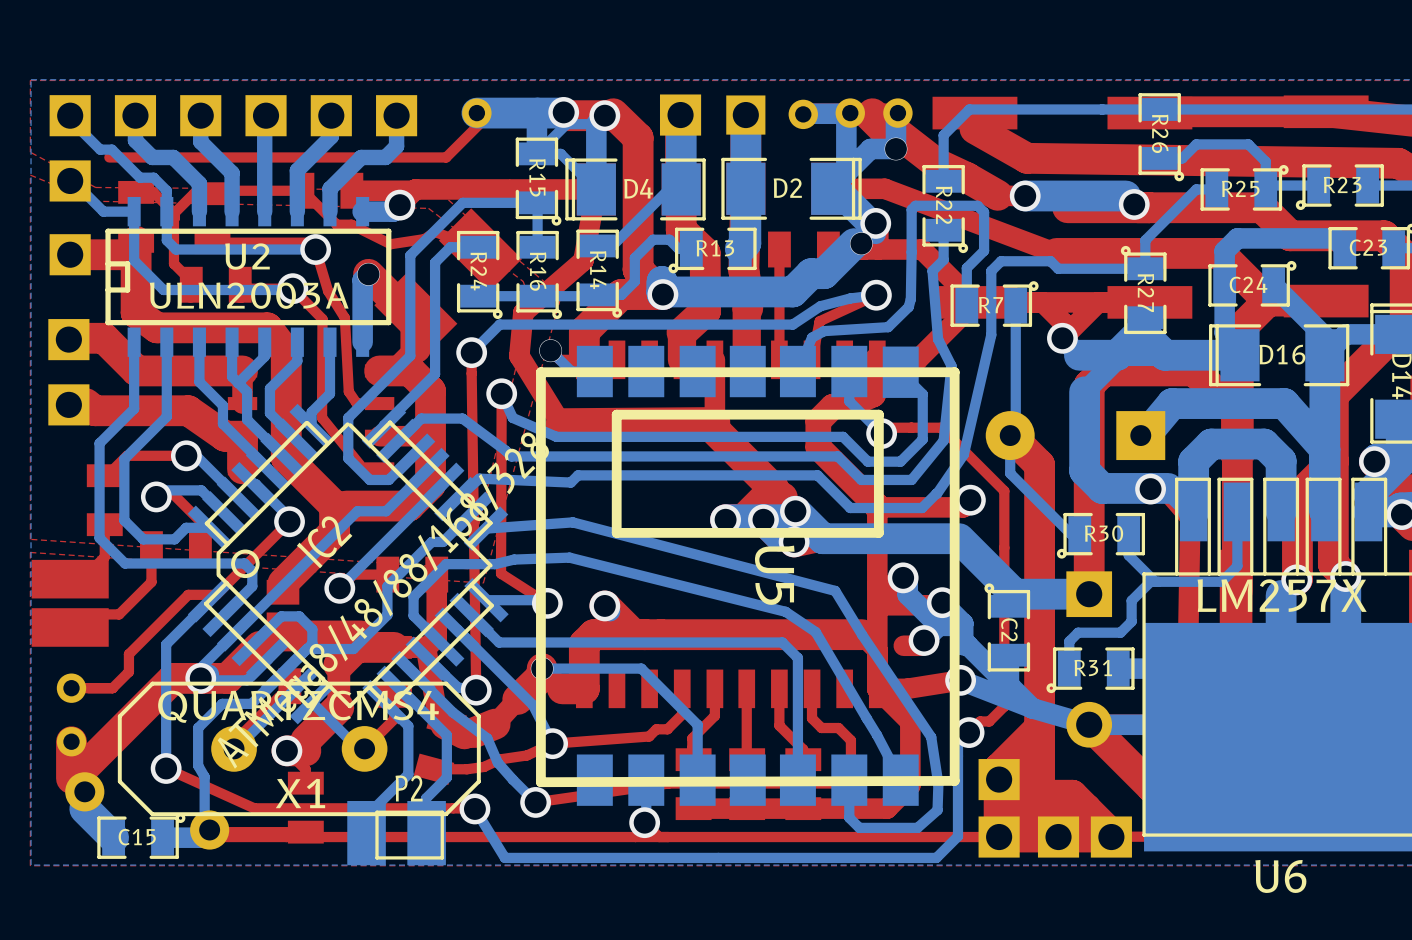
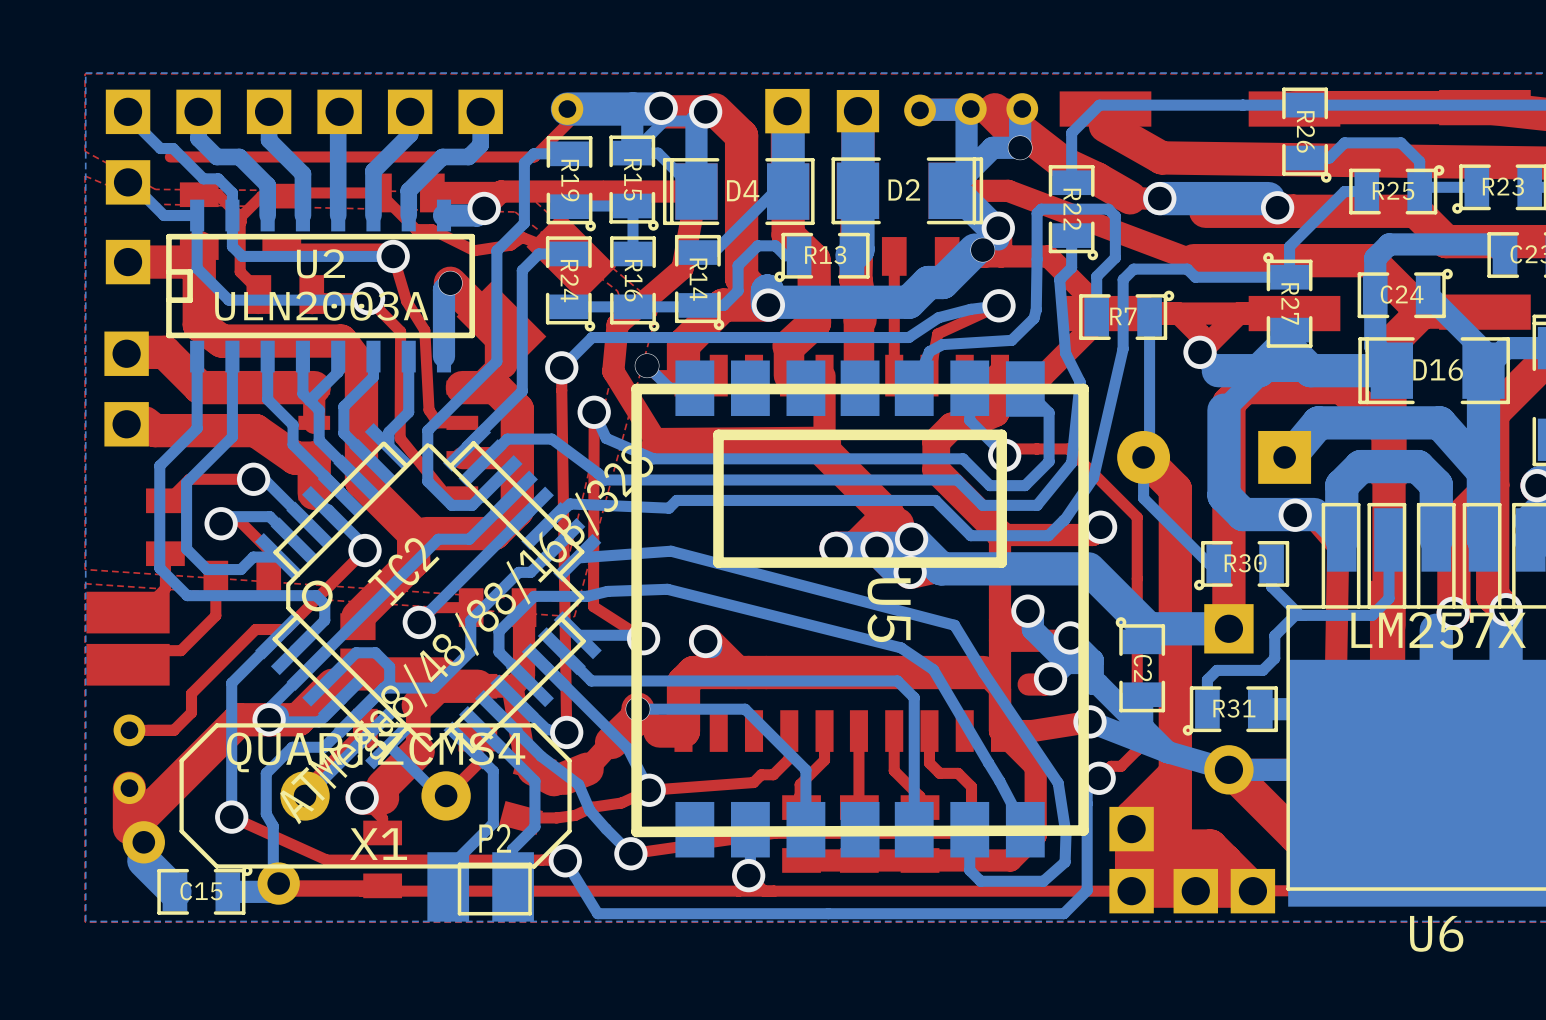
R19: none -> (571, 183)
bottom track: (479, 202) (462, 202) (410, 255) (410, 355) (348, 417) (348, 458) -> (569, 153) (533, 153) (524, 163) (524, 223) (496, 250) (496, 361) (427, 430) (428, 482)

